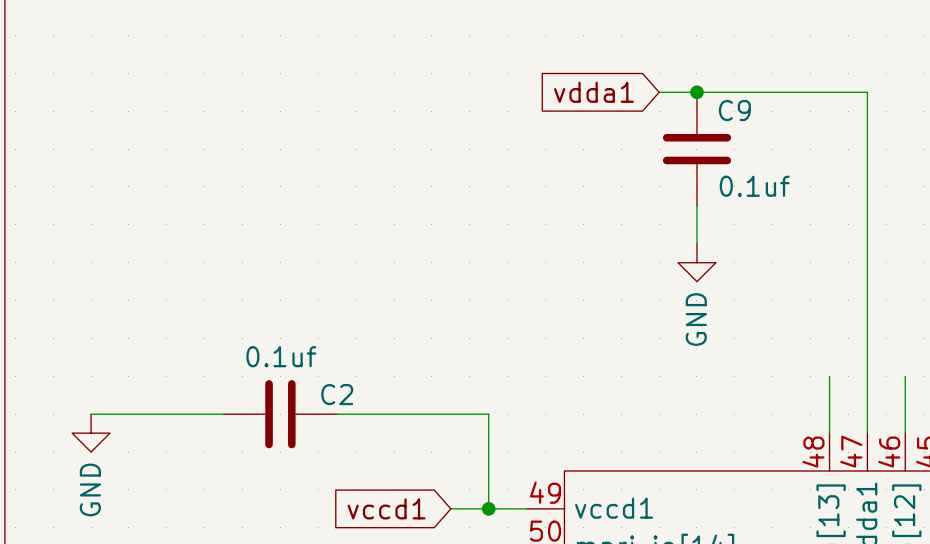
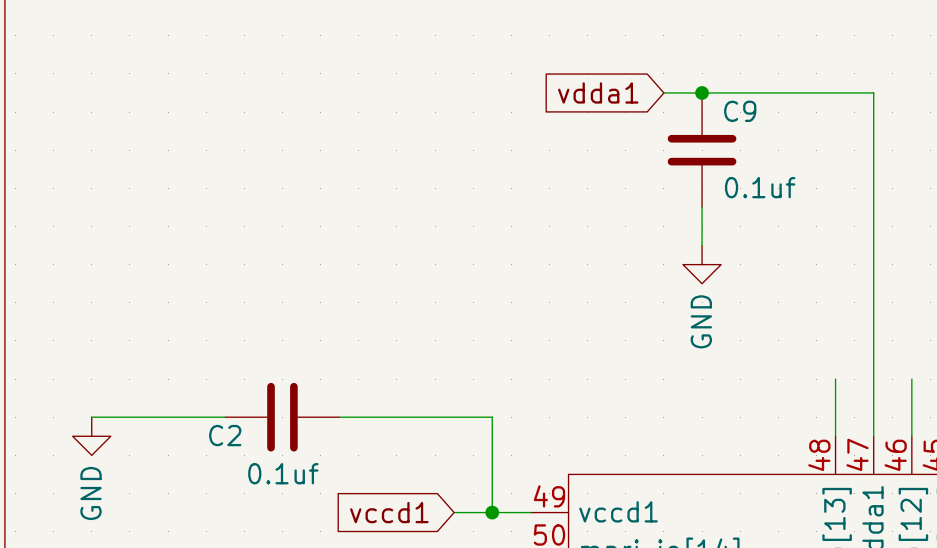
C2 value position: 0.1uf (281, 356) -> 0.1uf (283, 473)
C2 name position: C2 (337, 394) -> C2 (225, 435)

